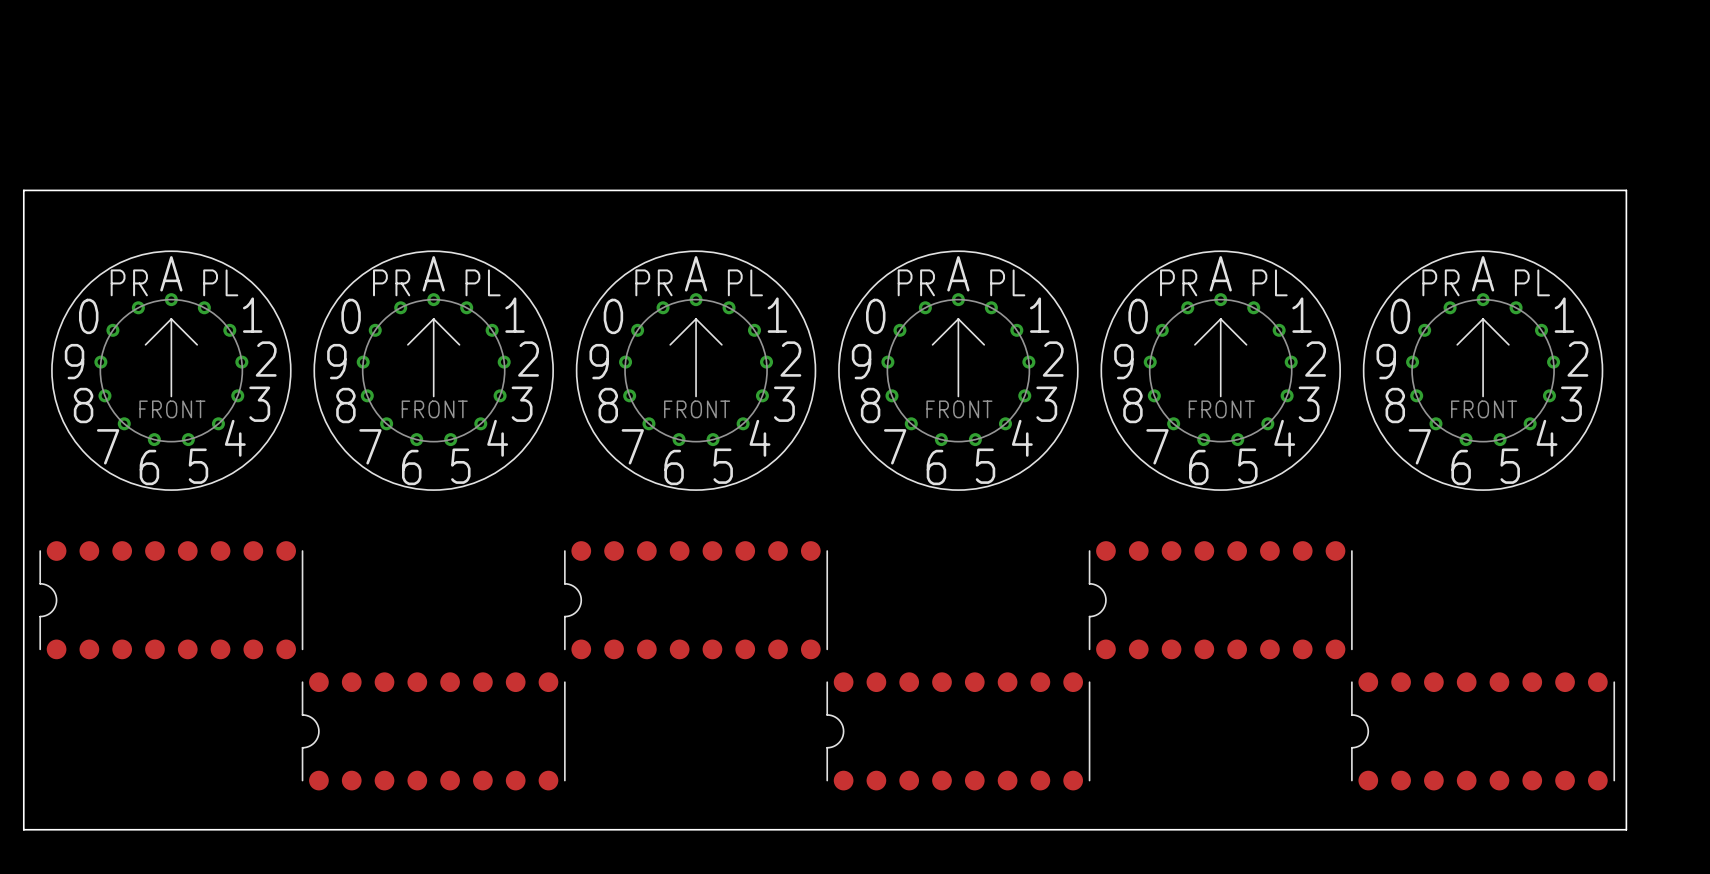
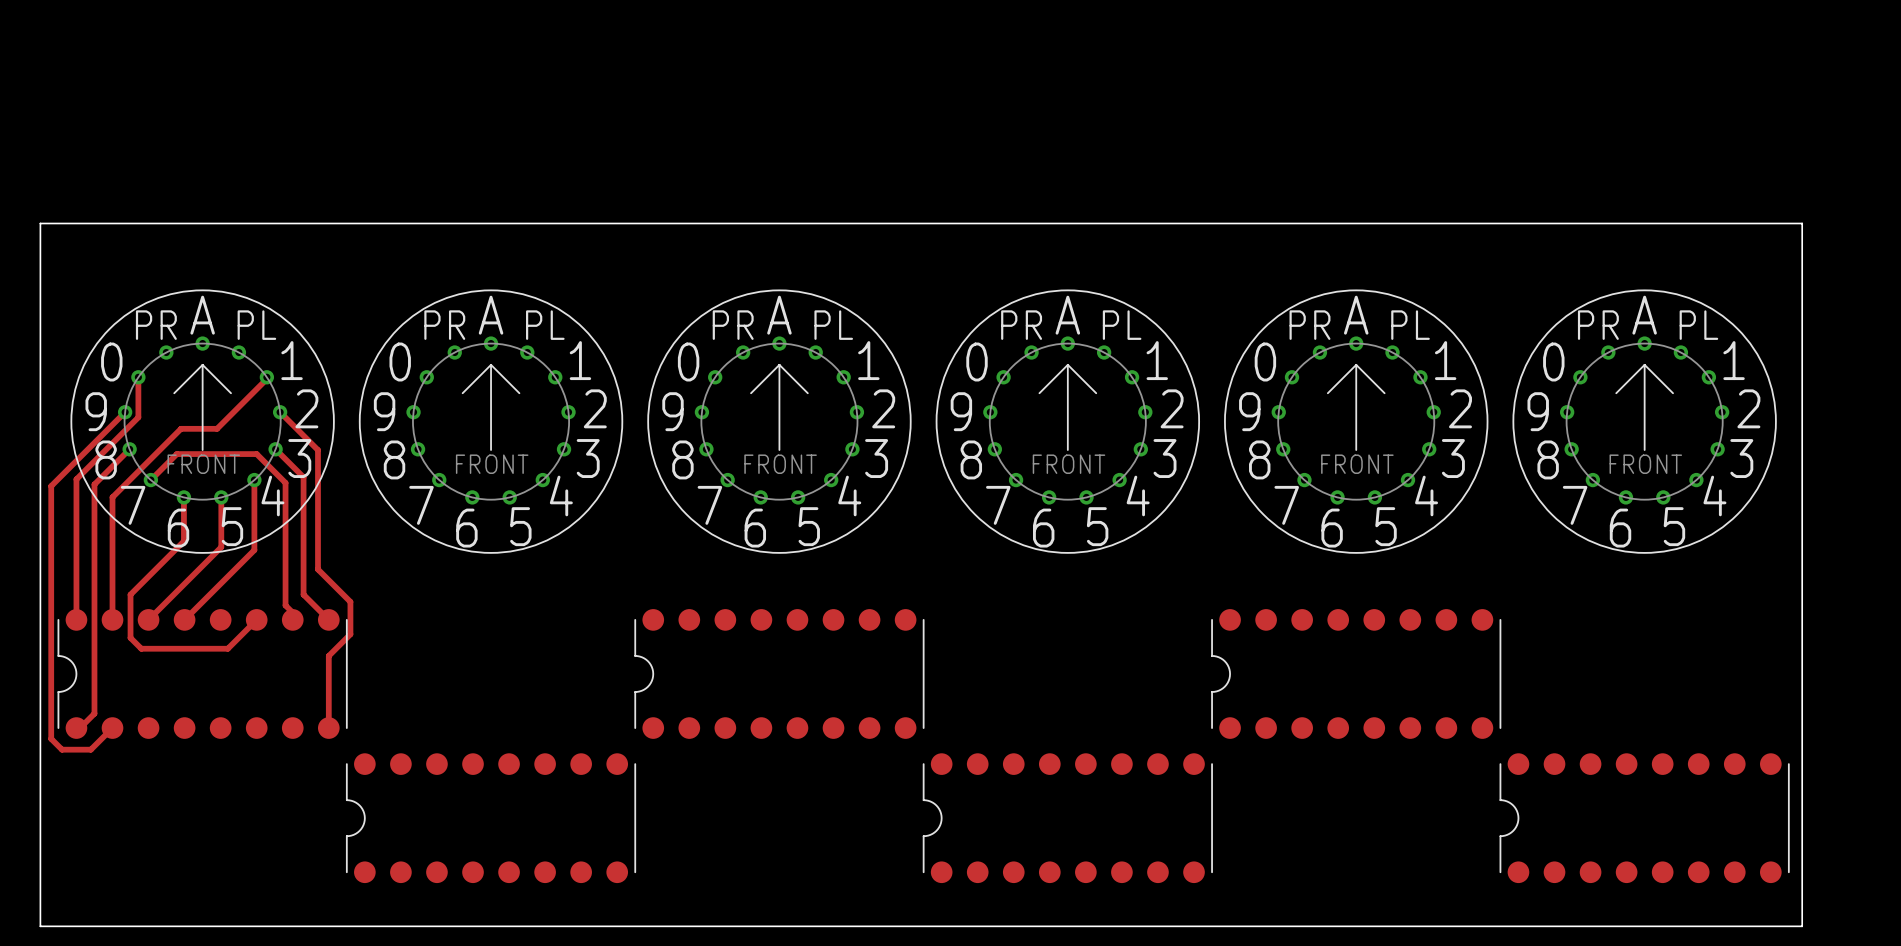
track: none -> (138, 377) (138, 417) (76, 479) (76, 619)
track: none -> (266, 377) (217, 428) (181, 428) (112, 497) (112, 619)
track: none -> (125, 412) (51, 486) (51, 738) (62, 749) (90, 749) (112, 728)
track: none -> (280, 412) (317, 450) (317, 569) (350, 601) (350, 634) (328, 655) (328, 728)
track: none -> (129, 449) (94, 484) (94, 713) (80, 728) (76, 728)
track: none -> (275, 449) (303, 477) (303, 594) (328, 619)
track: none -> (150, 480) (176, 454) (256, 454) (285, 482) (285, 605) (292, 612) (292, 619)
track: none -> (254, 480) (254, 550) (184, 619)
track: none -> (183, 497) (183, 541) (130, 594) (130, 637) (141, 648) (227, 648) (256, 619)
track: none -> (221, 497) (221, 547) (148, 619)

